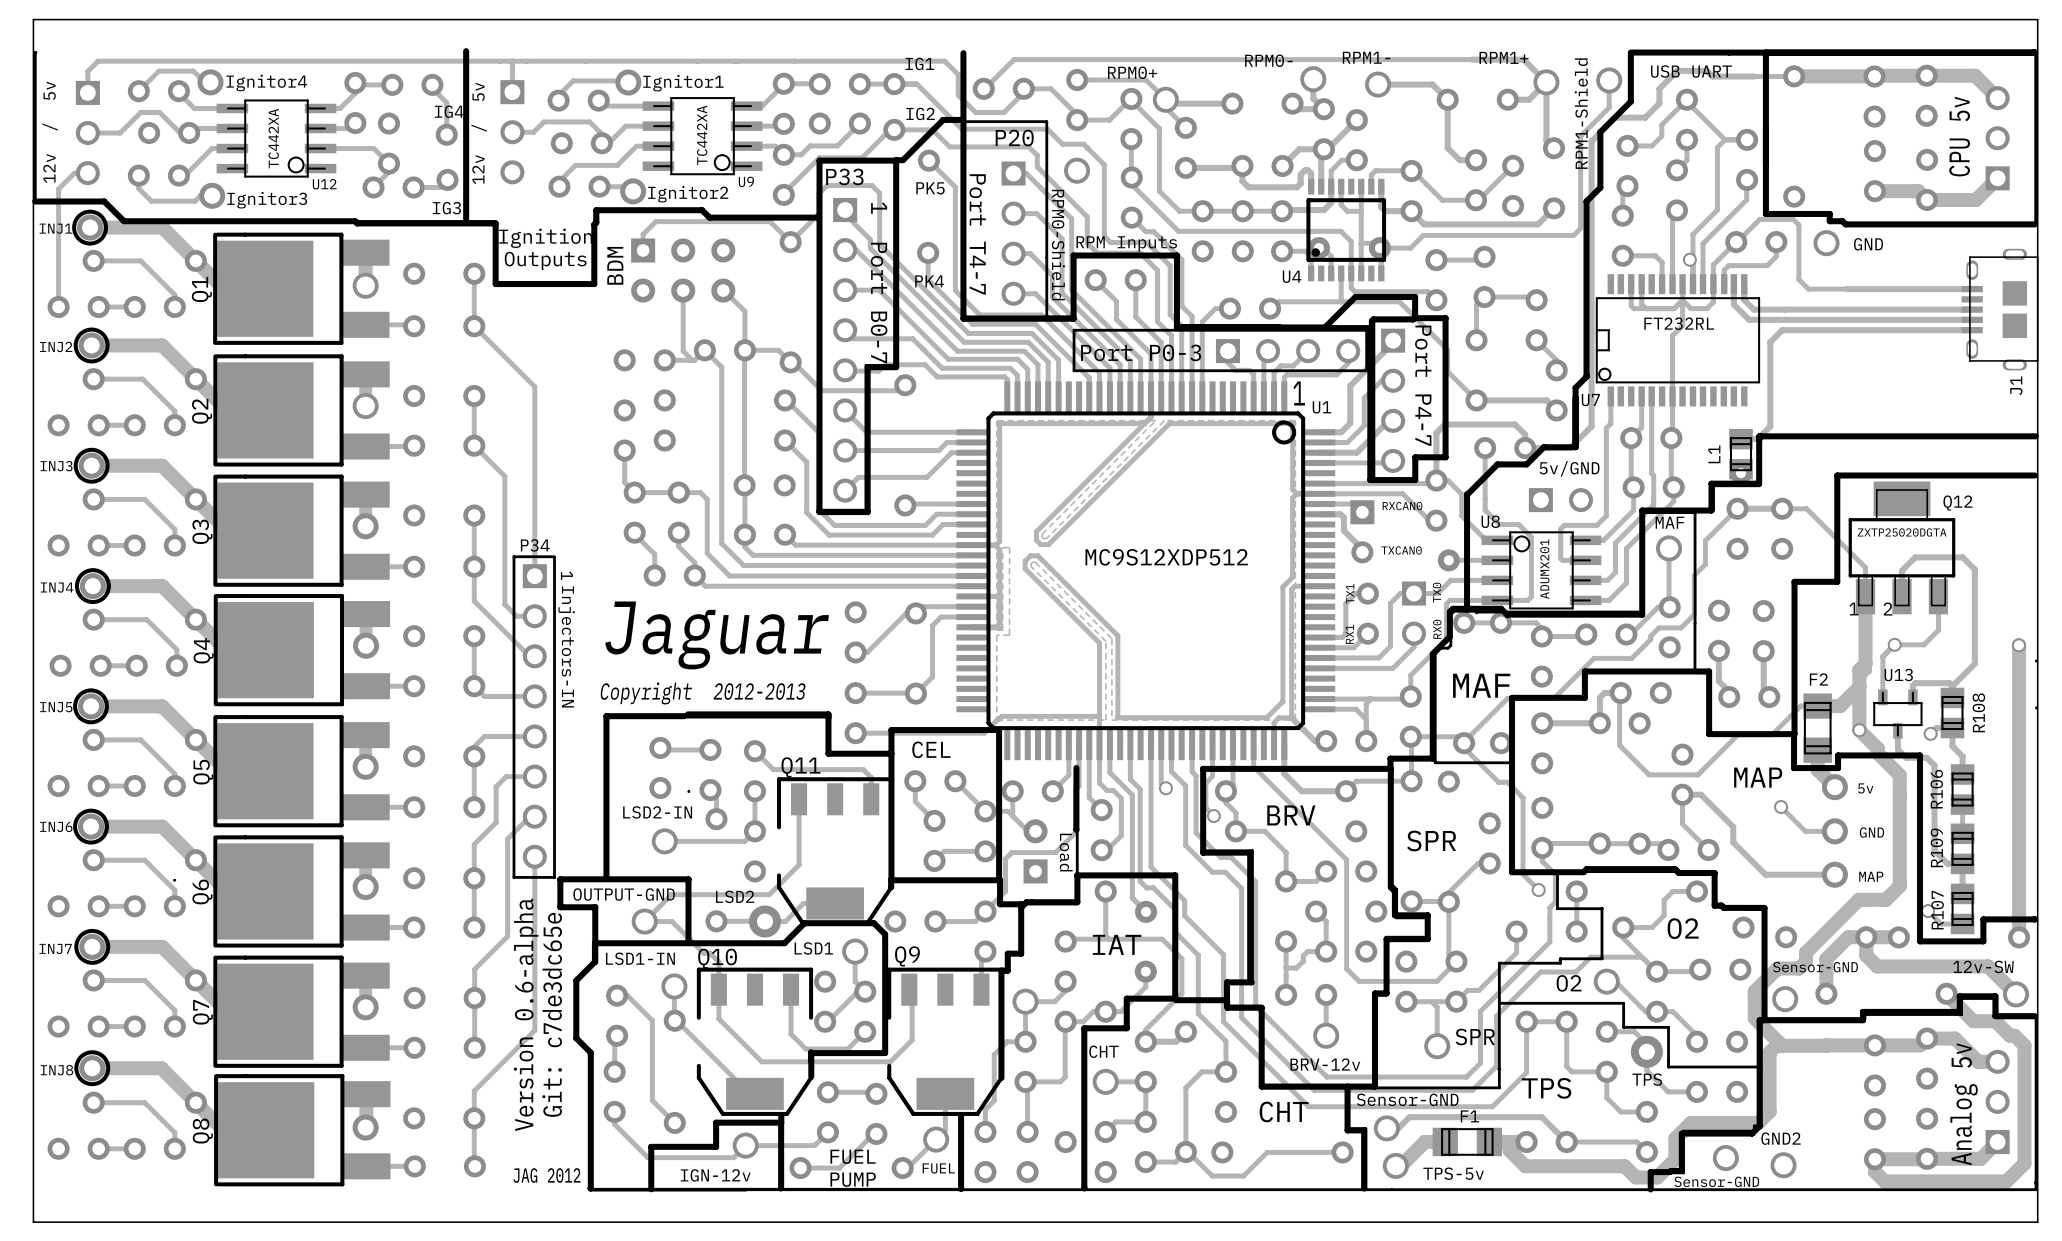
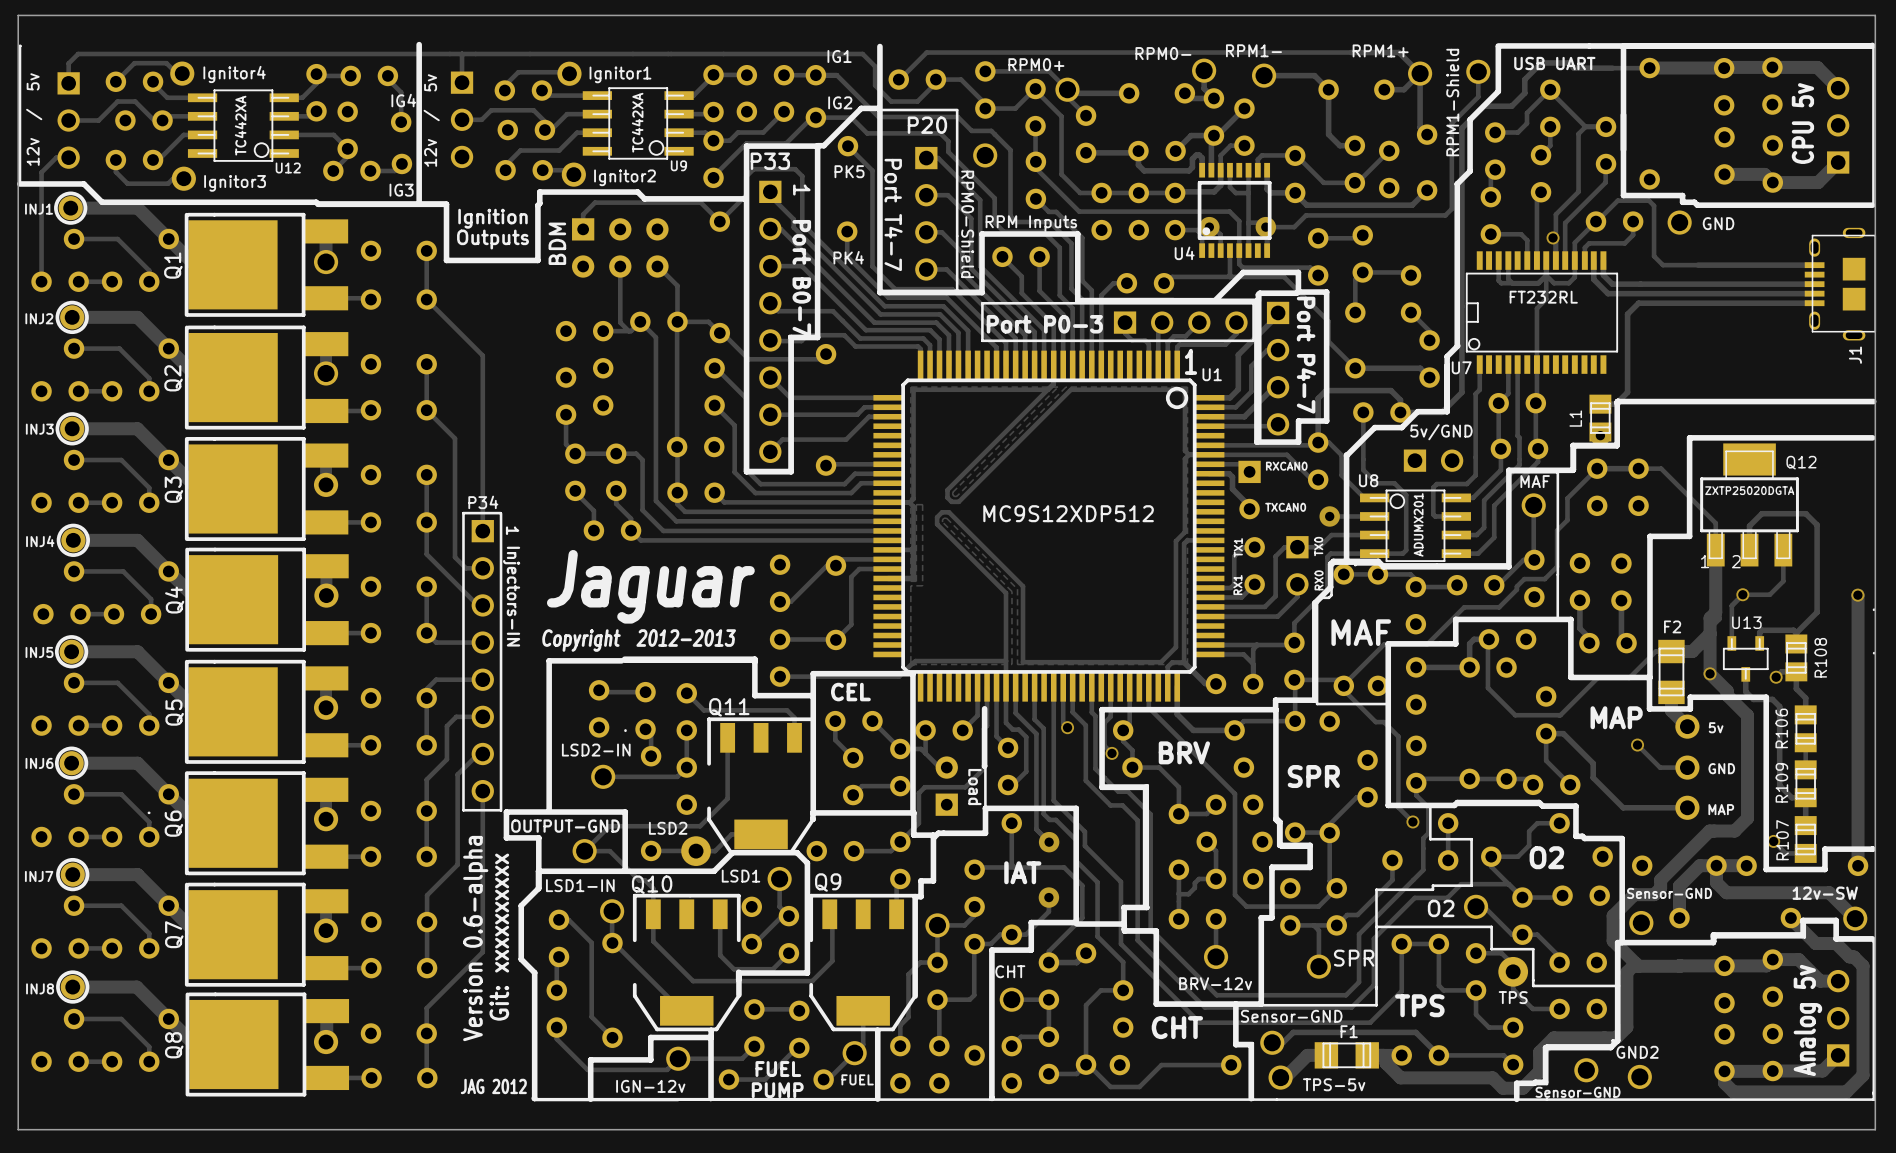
text: Git: c7de3dc65e (552, 1014) -> Git: xxxxxxxxxx (499, 937)

